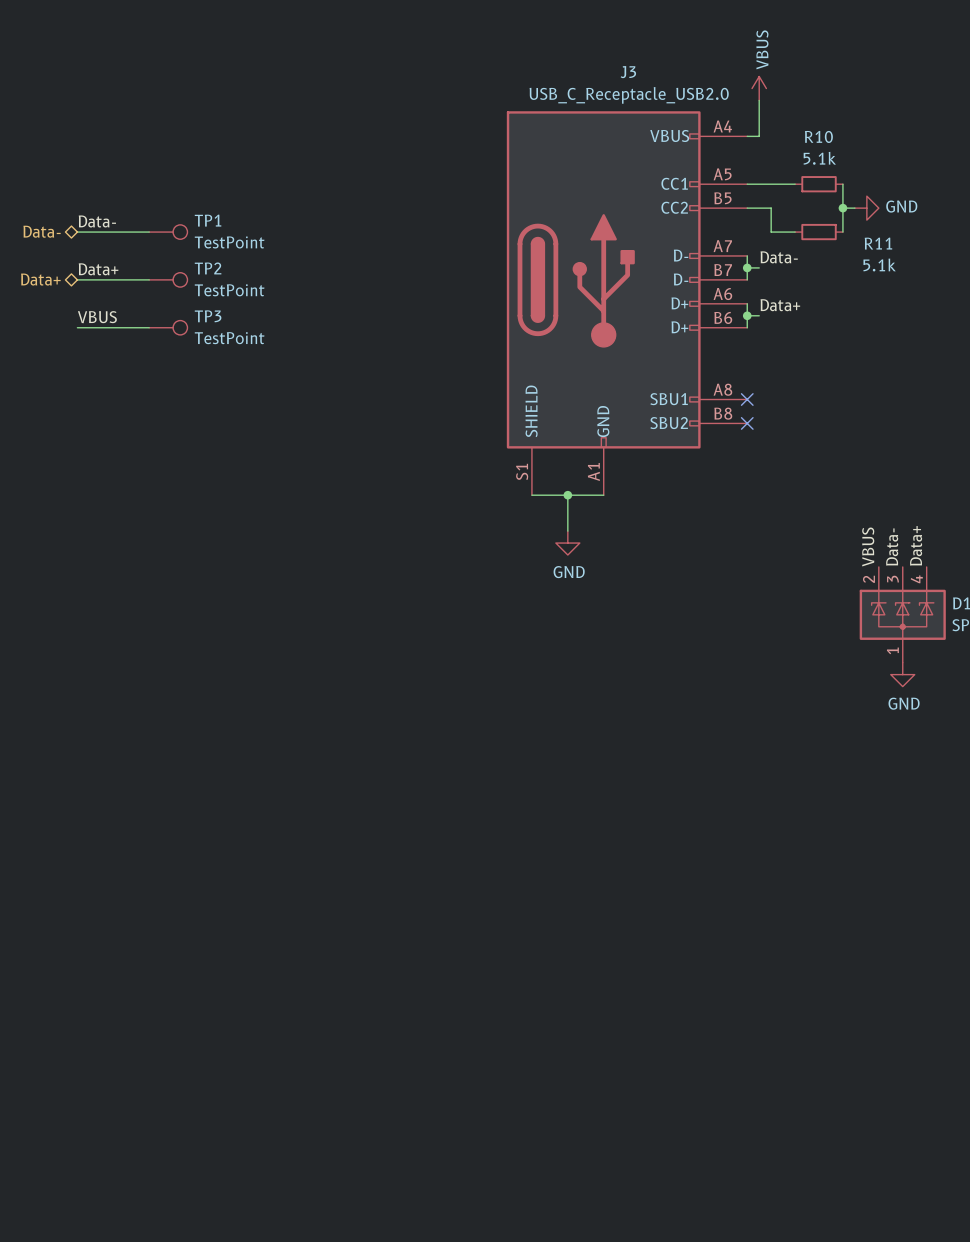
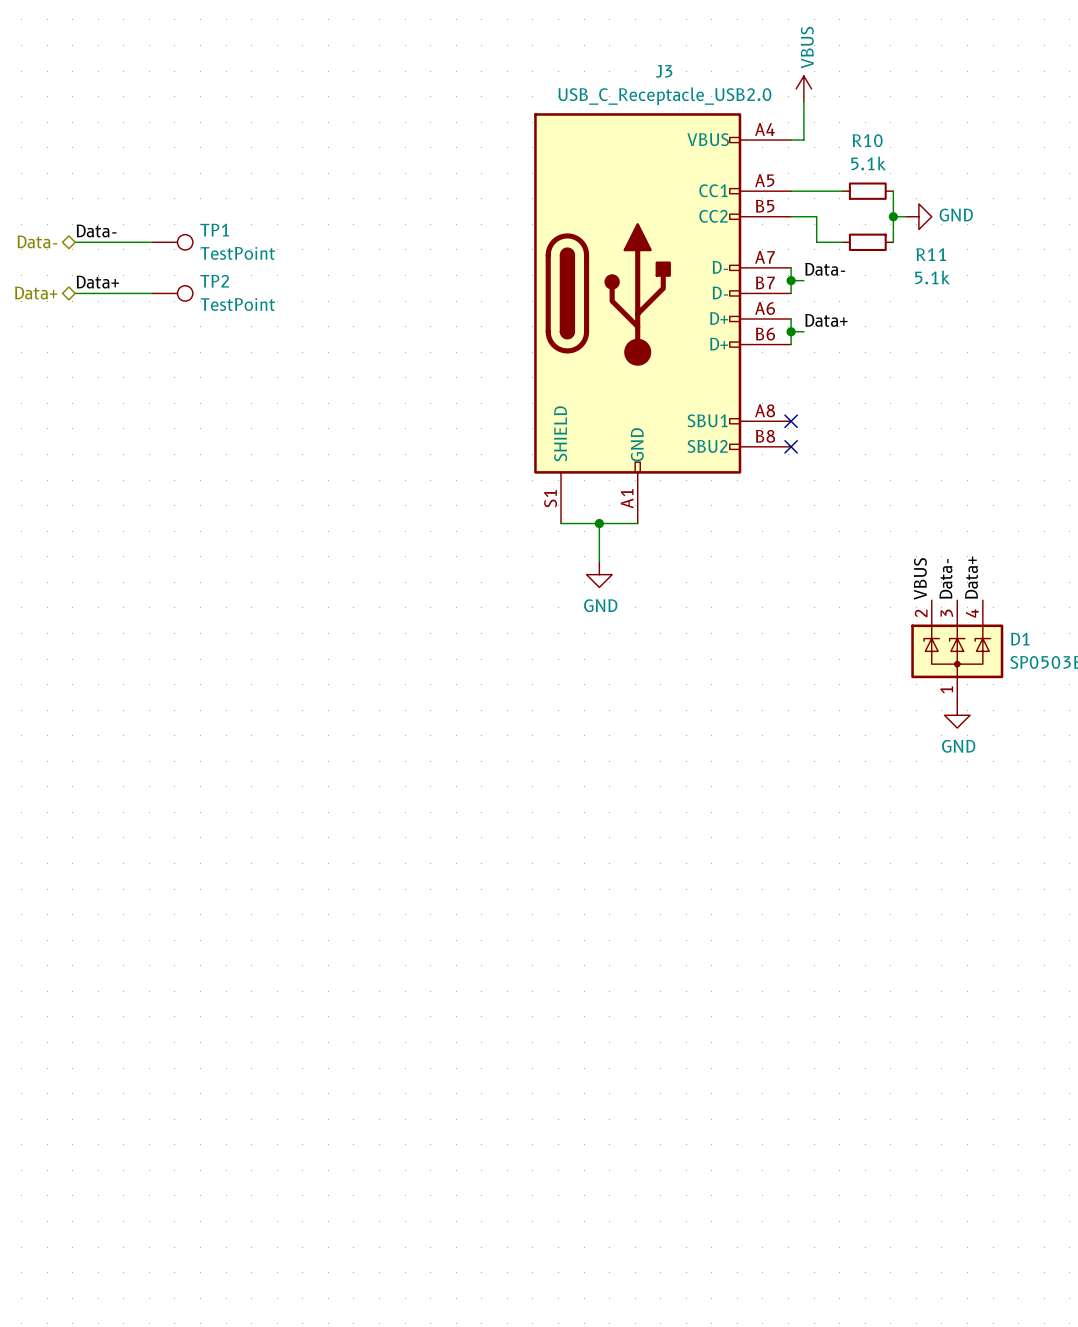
label: VBUS (97, 317) -> none
wire: (77, 327) (149, 327) -> none
TP3: TestPoint (168, 327) -> none

